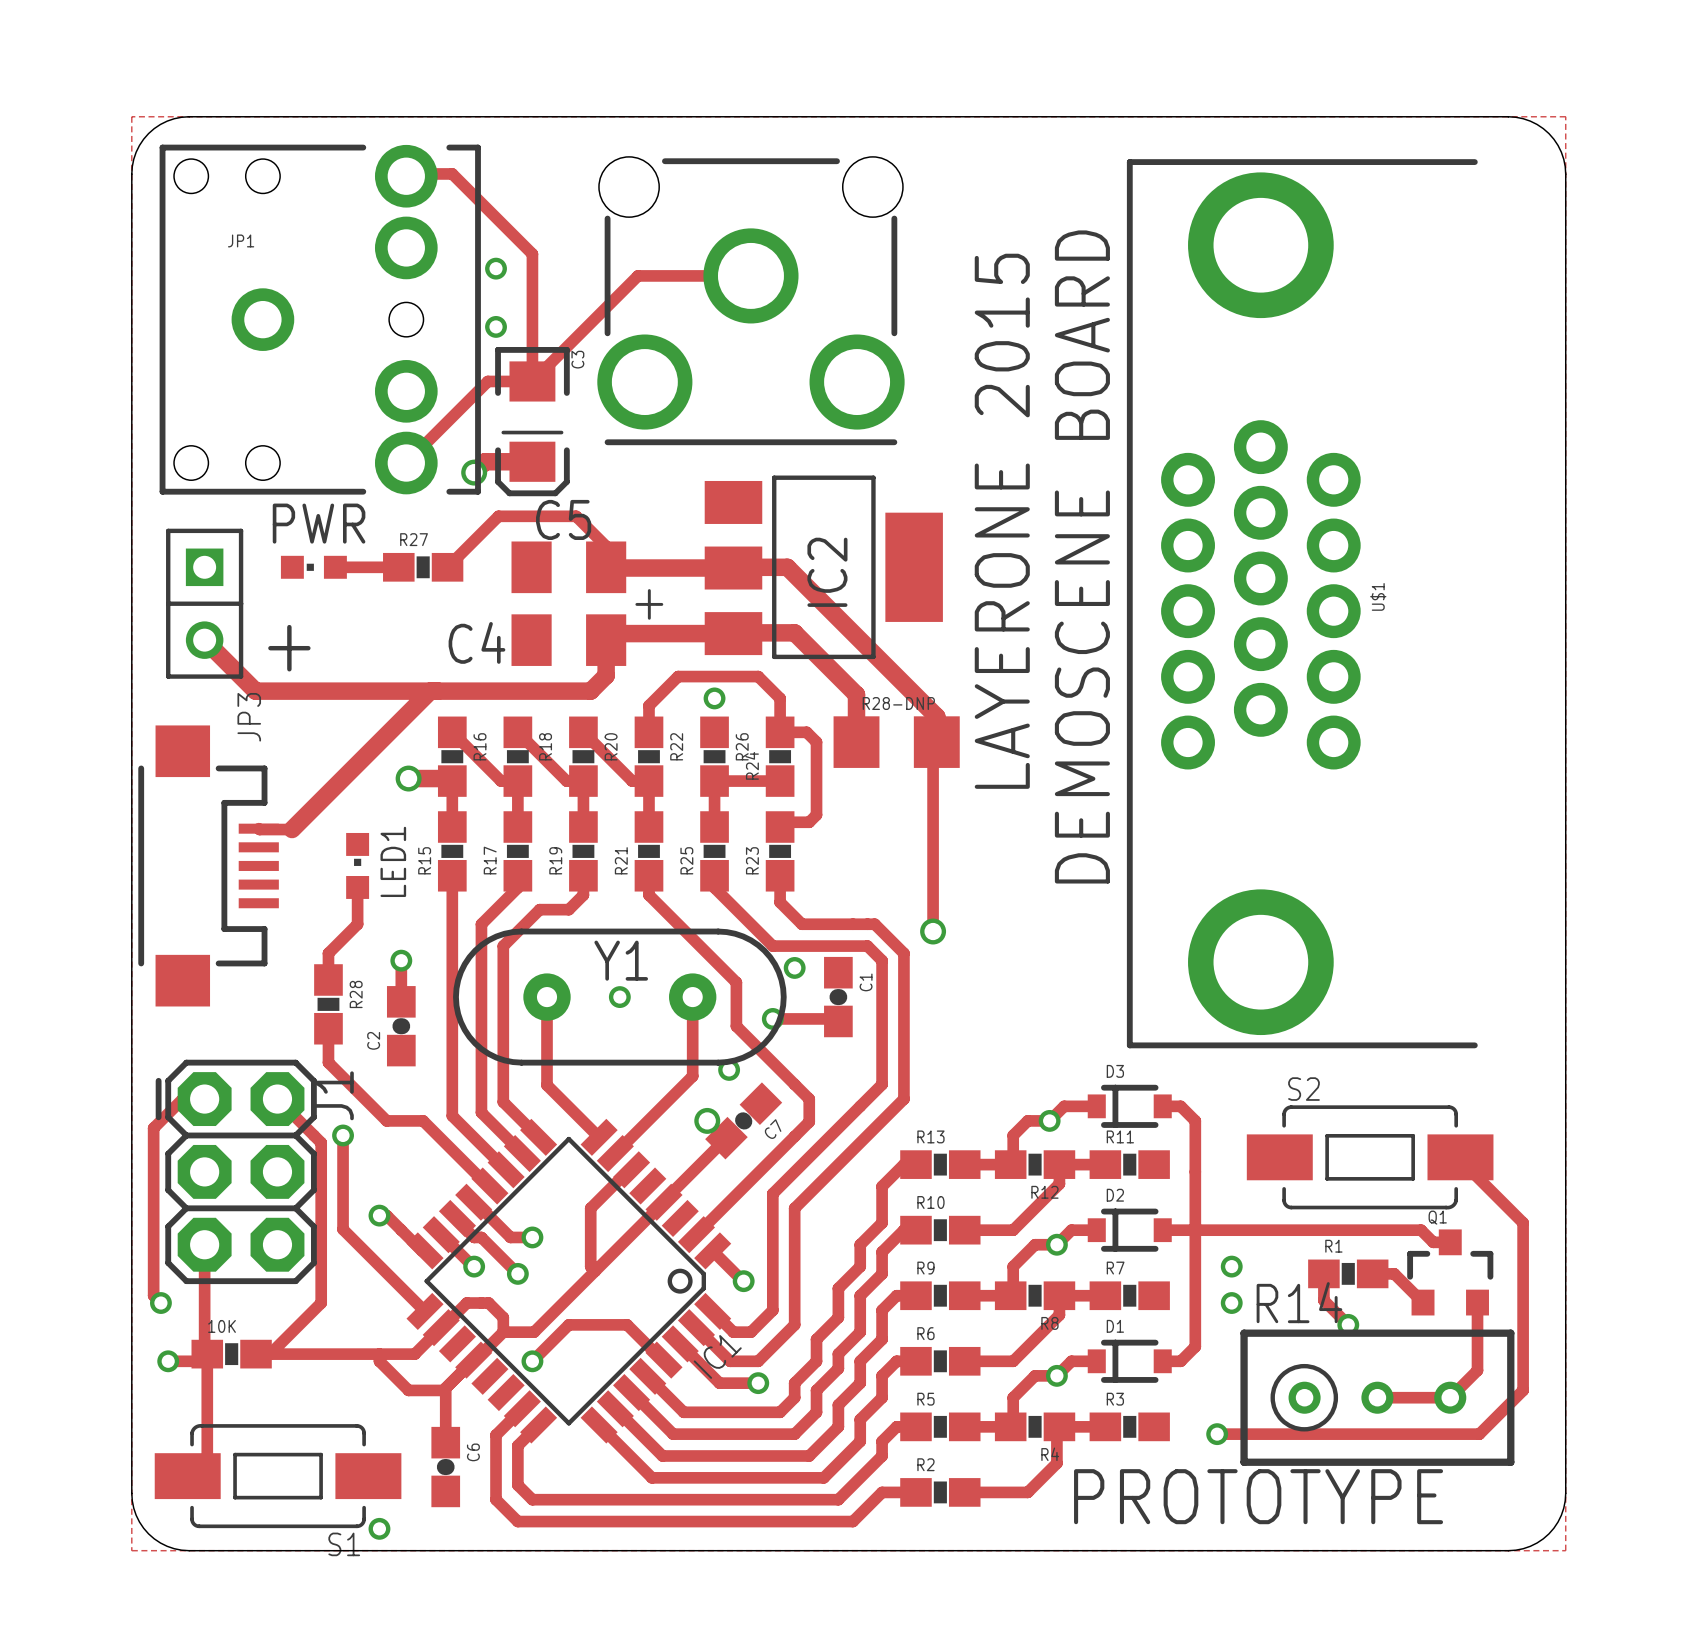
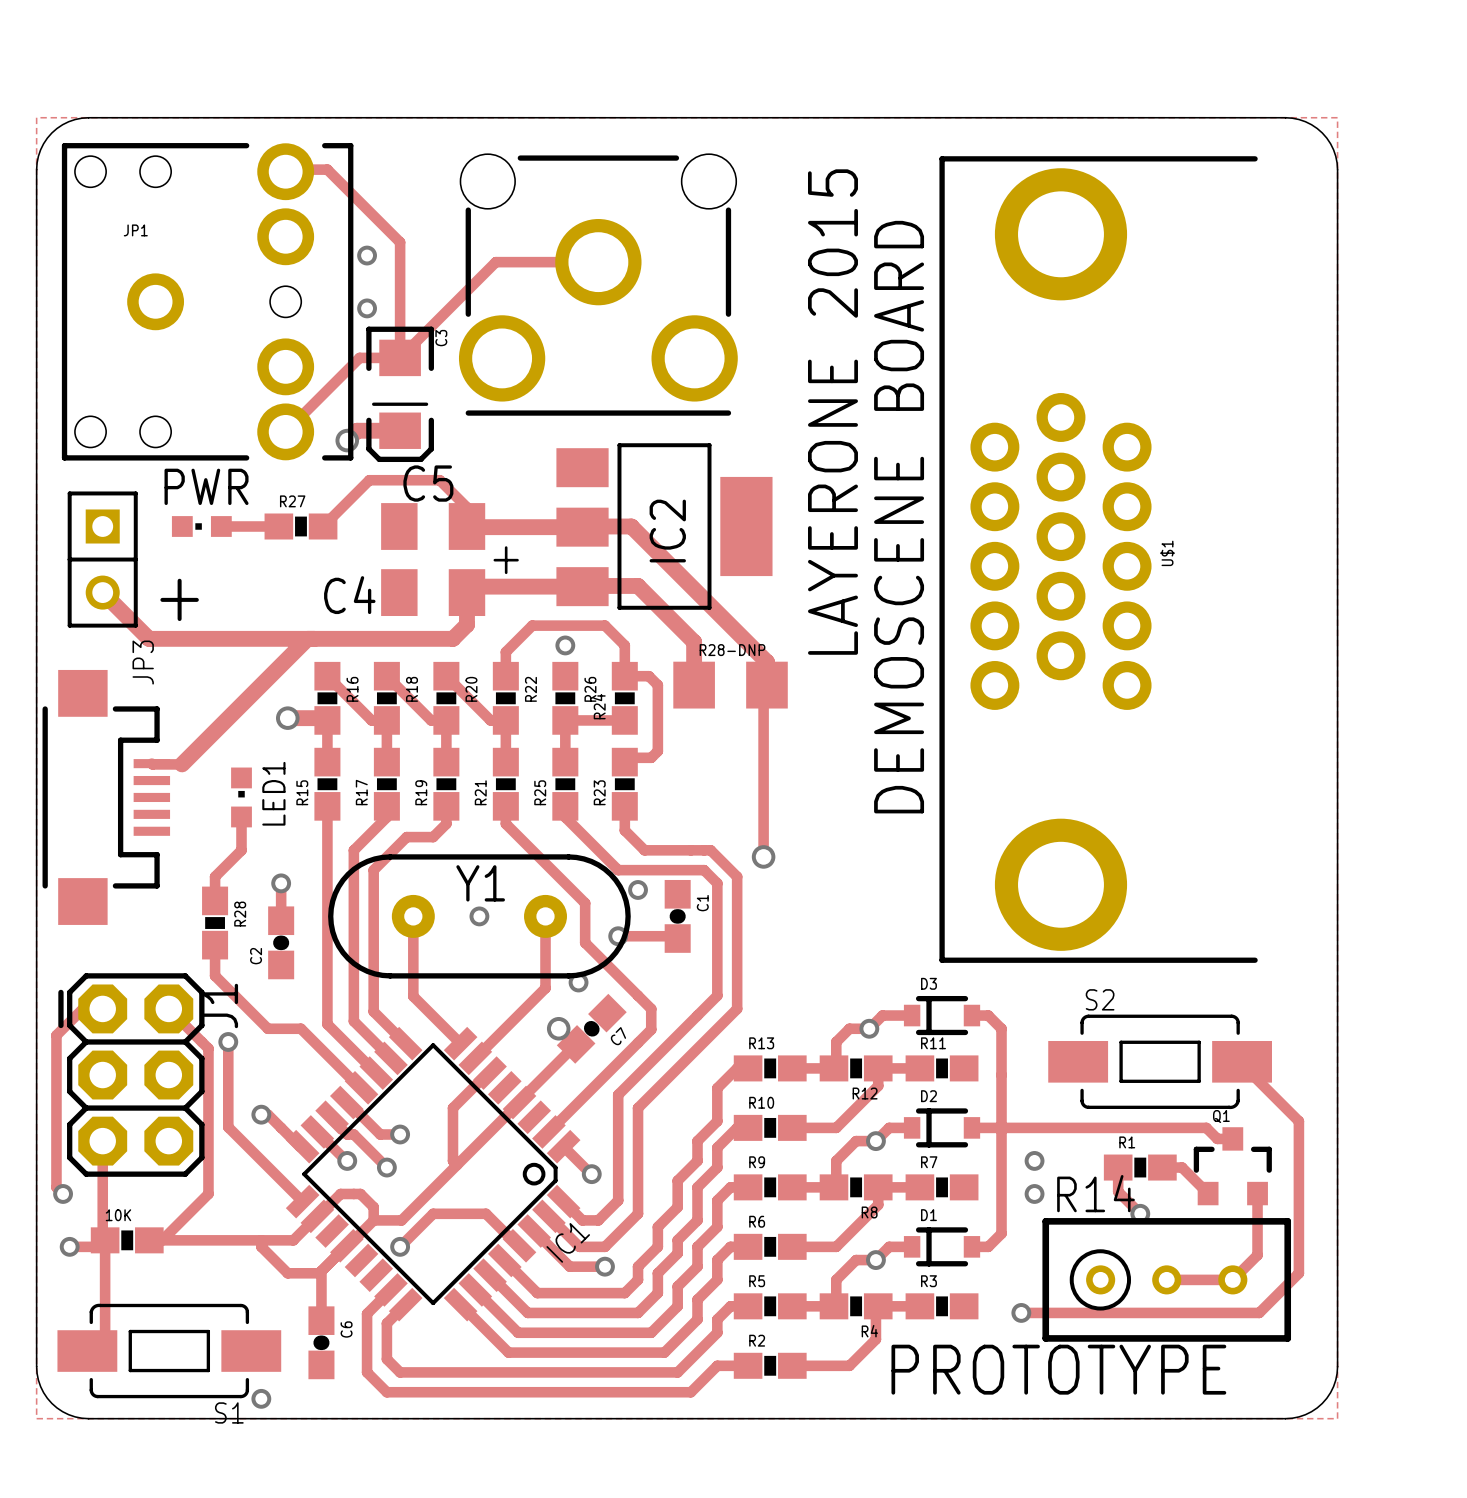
text position: LAYERONE 2015 (1002, 521) -> LAYERONE 2015 (832, 412)

